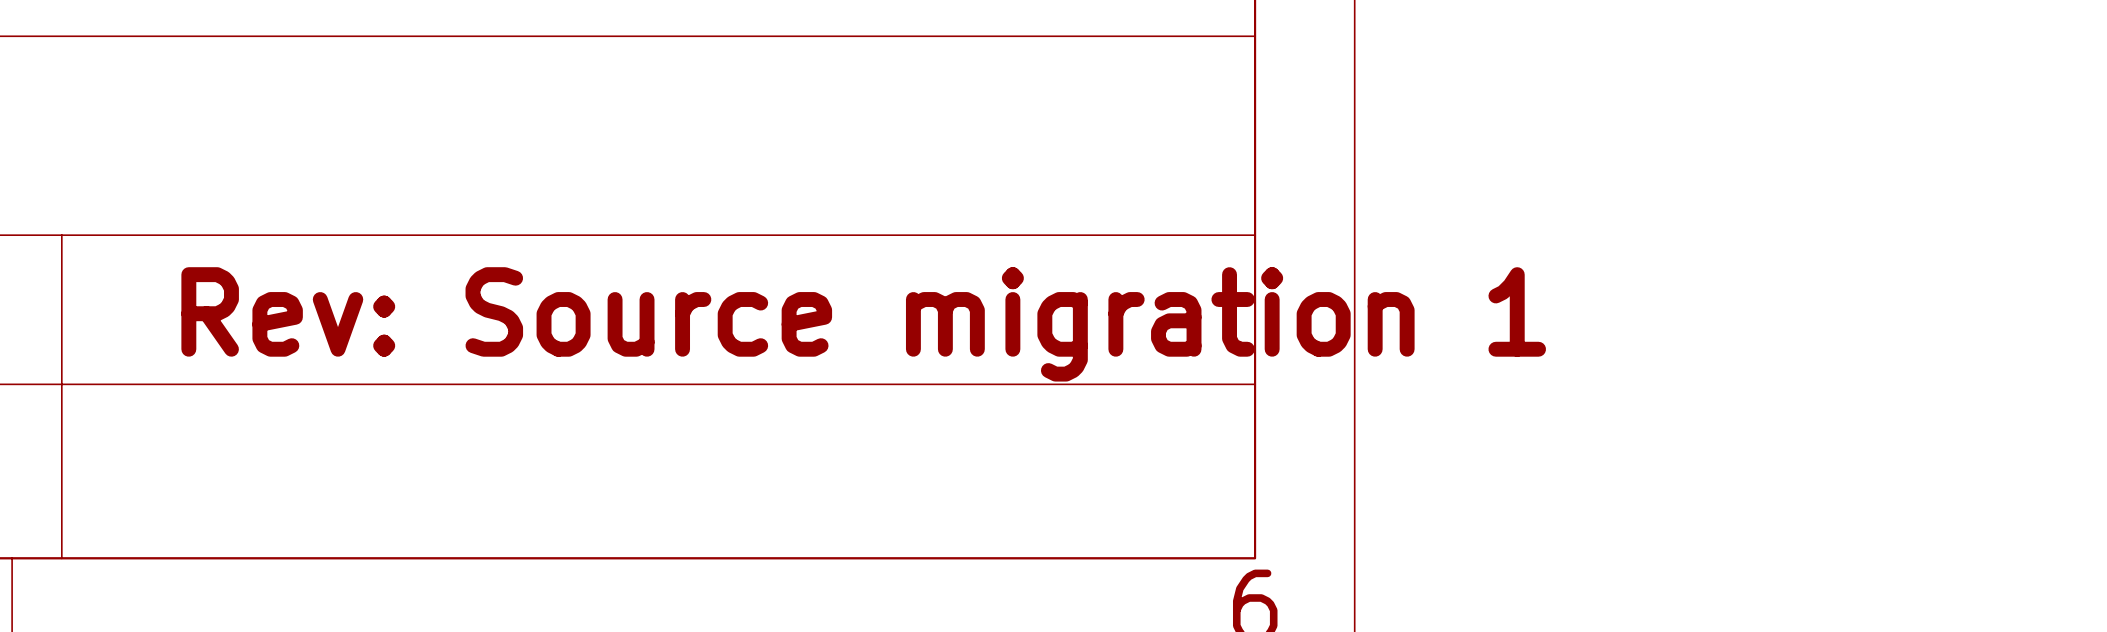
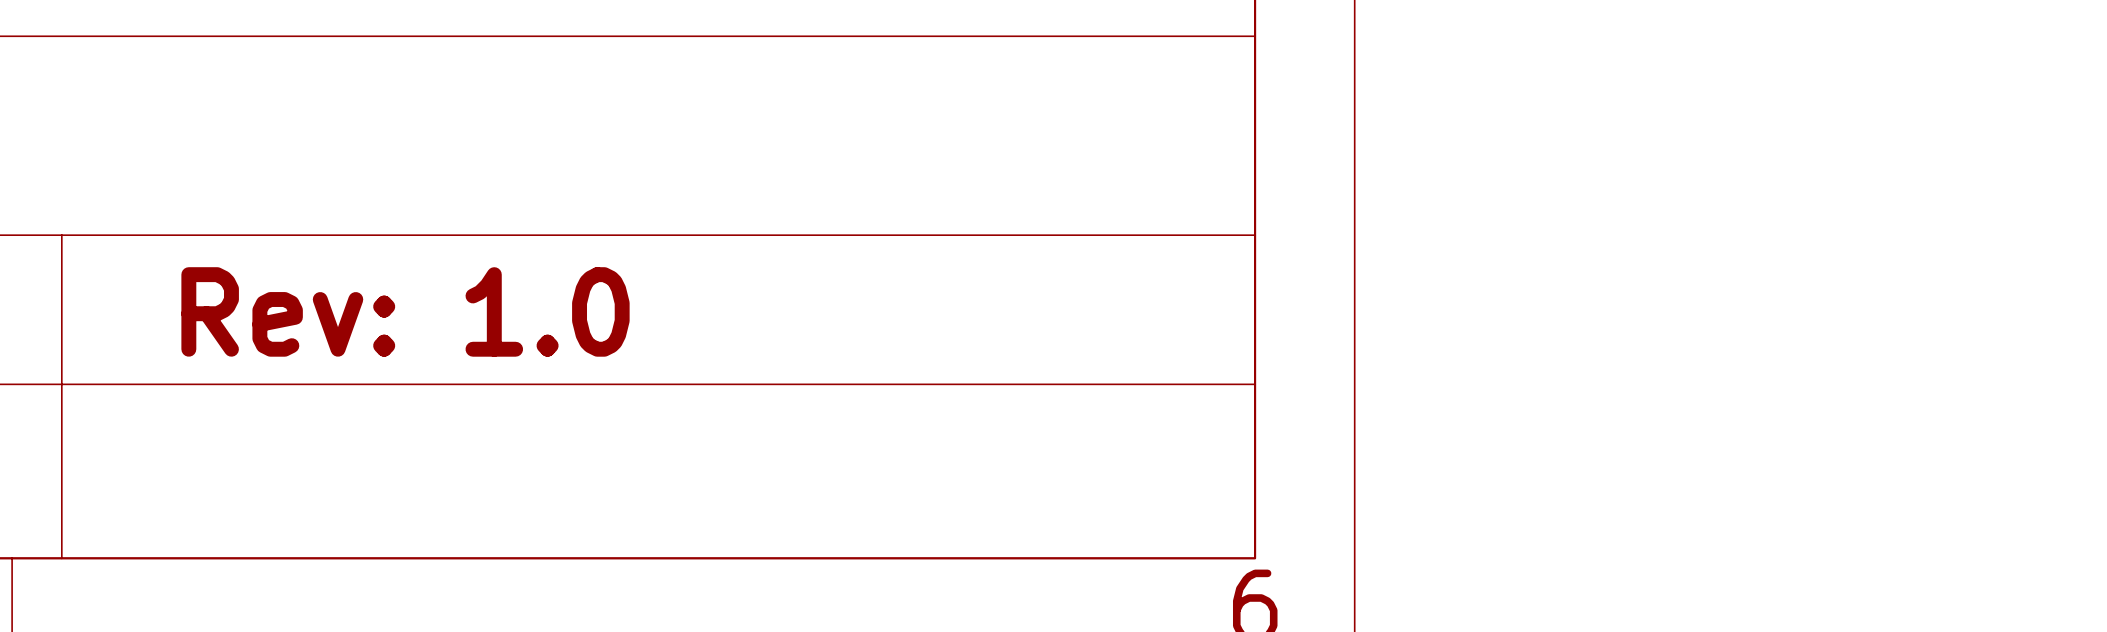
title block: Rev: Source migration 1 (863, 324) -> Rev: 1.0 (405, 311)

